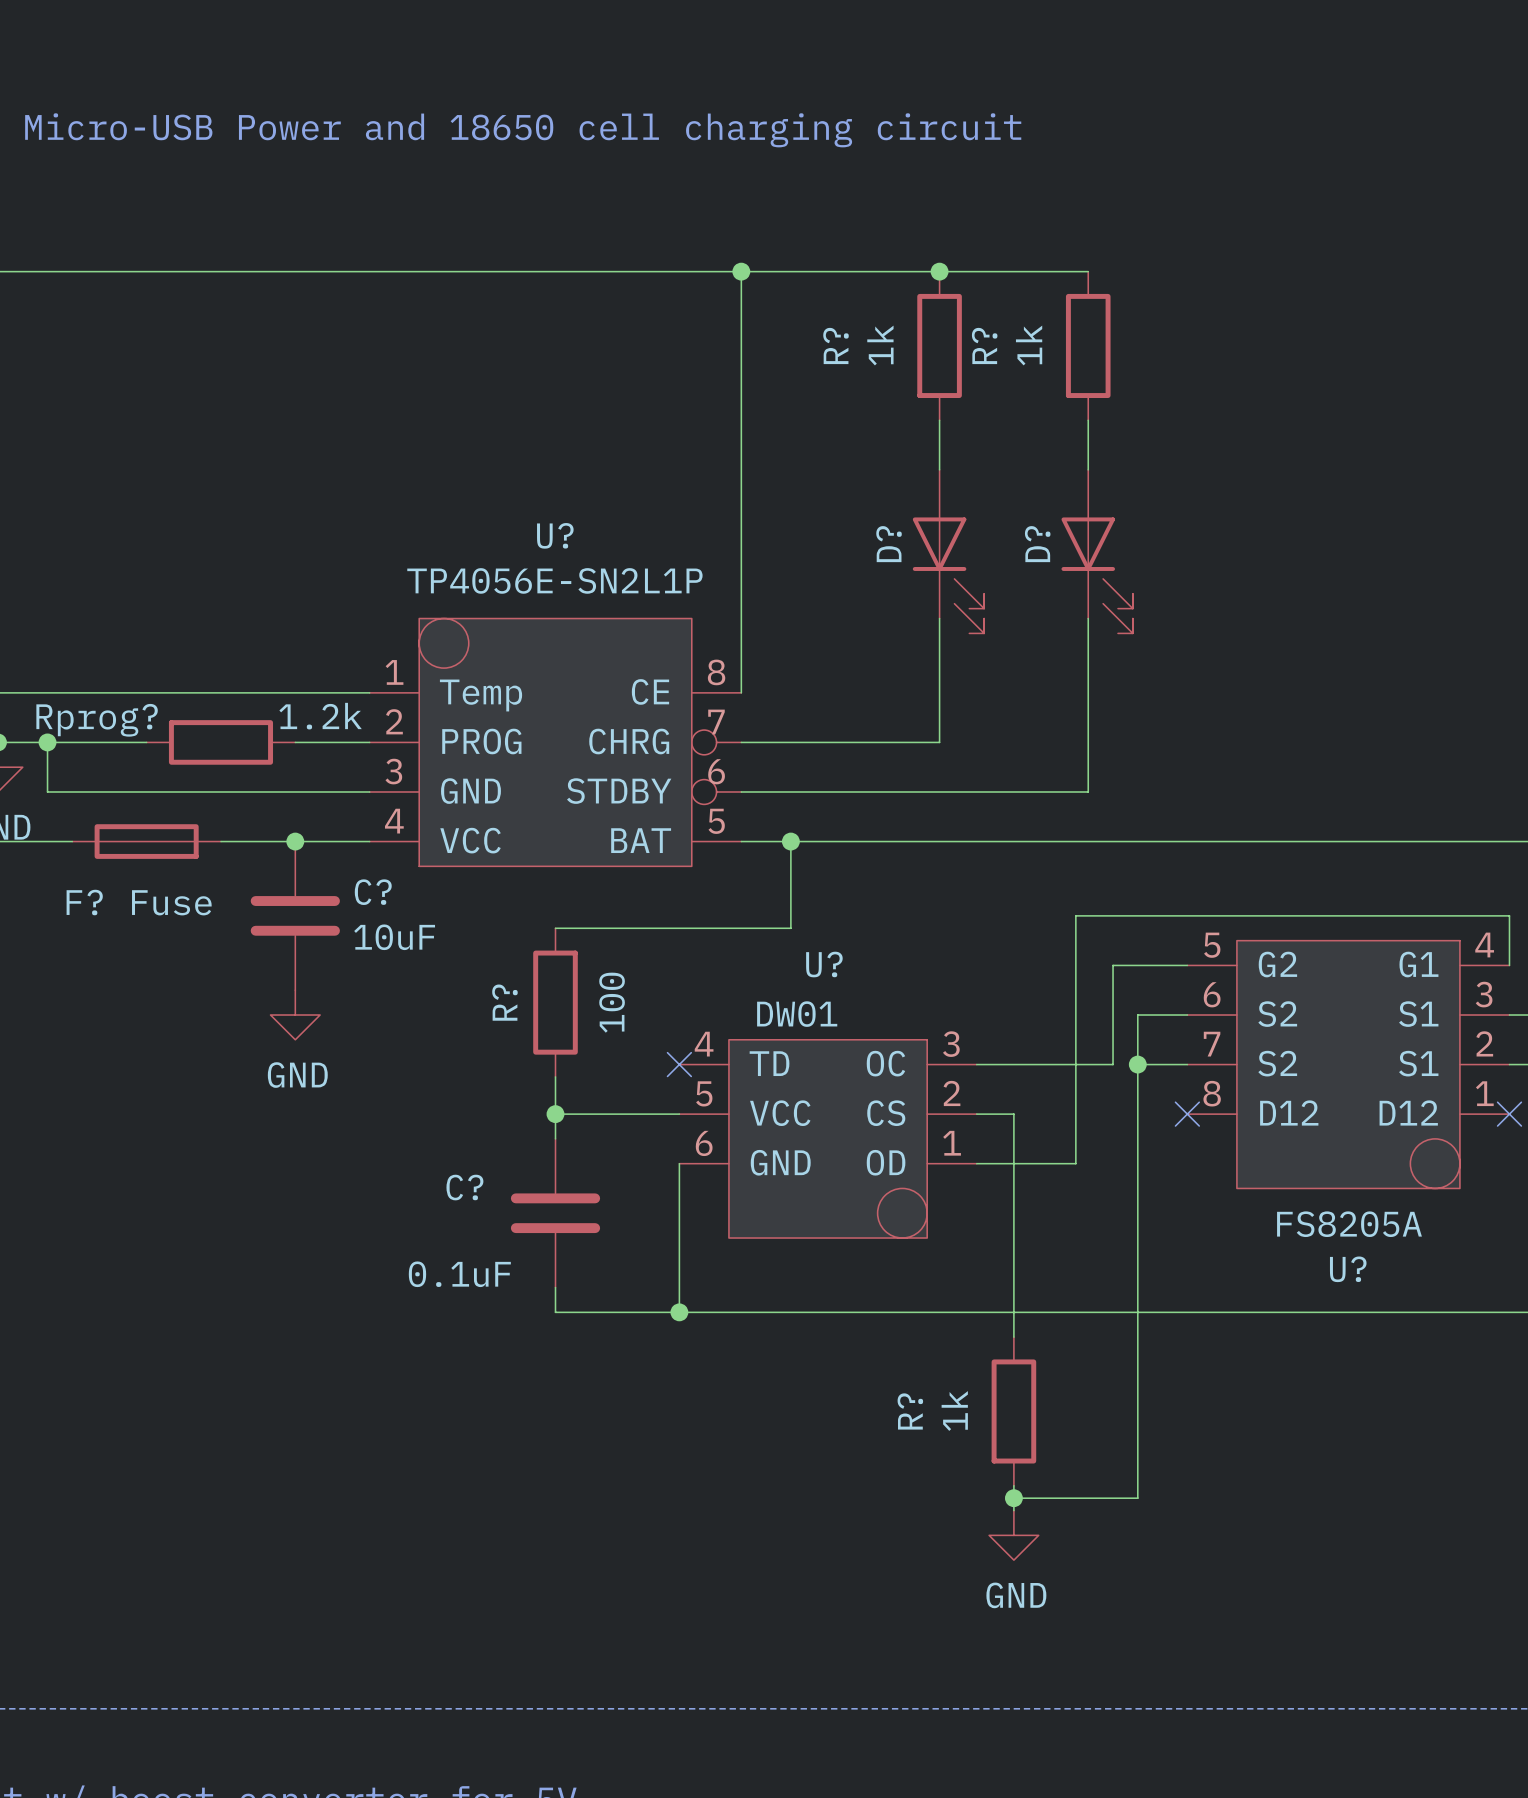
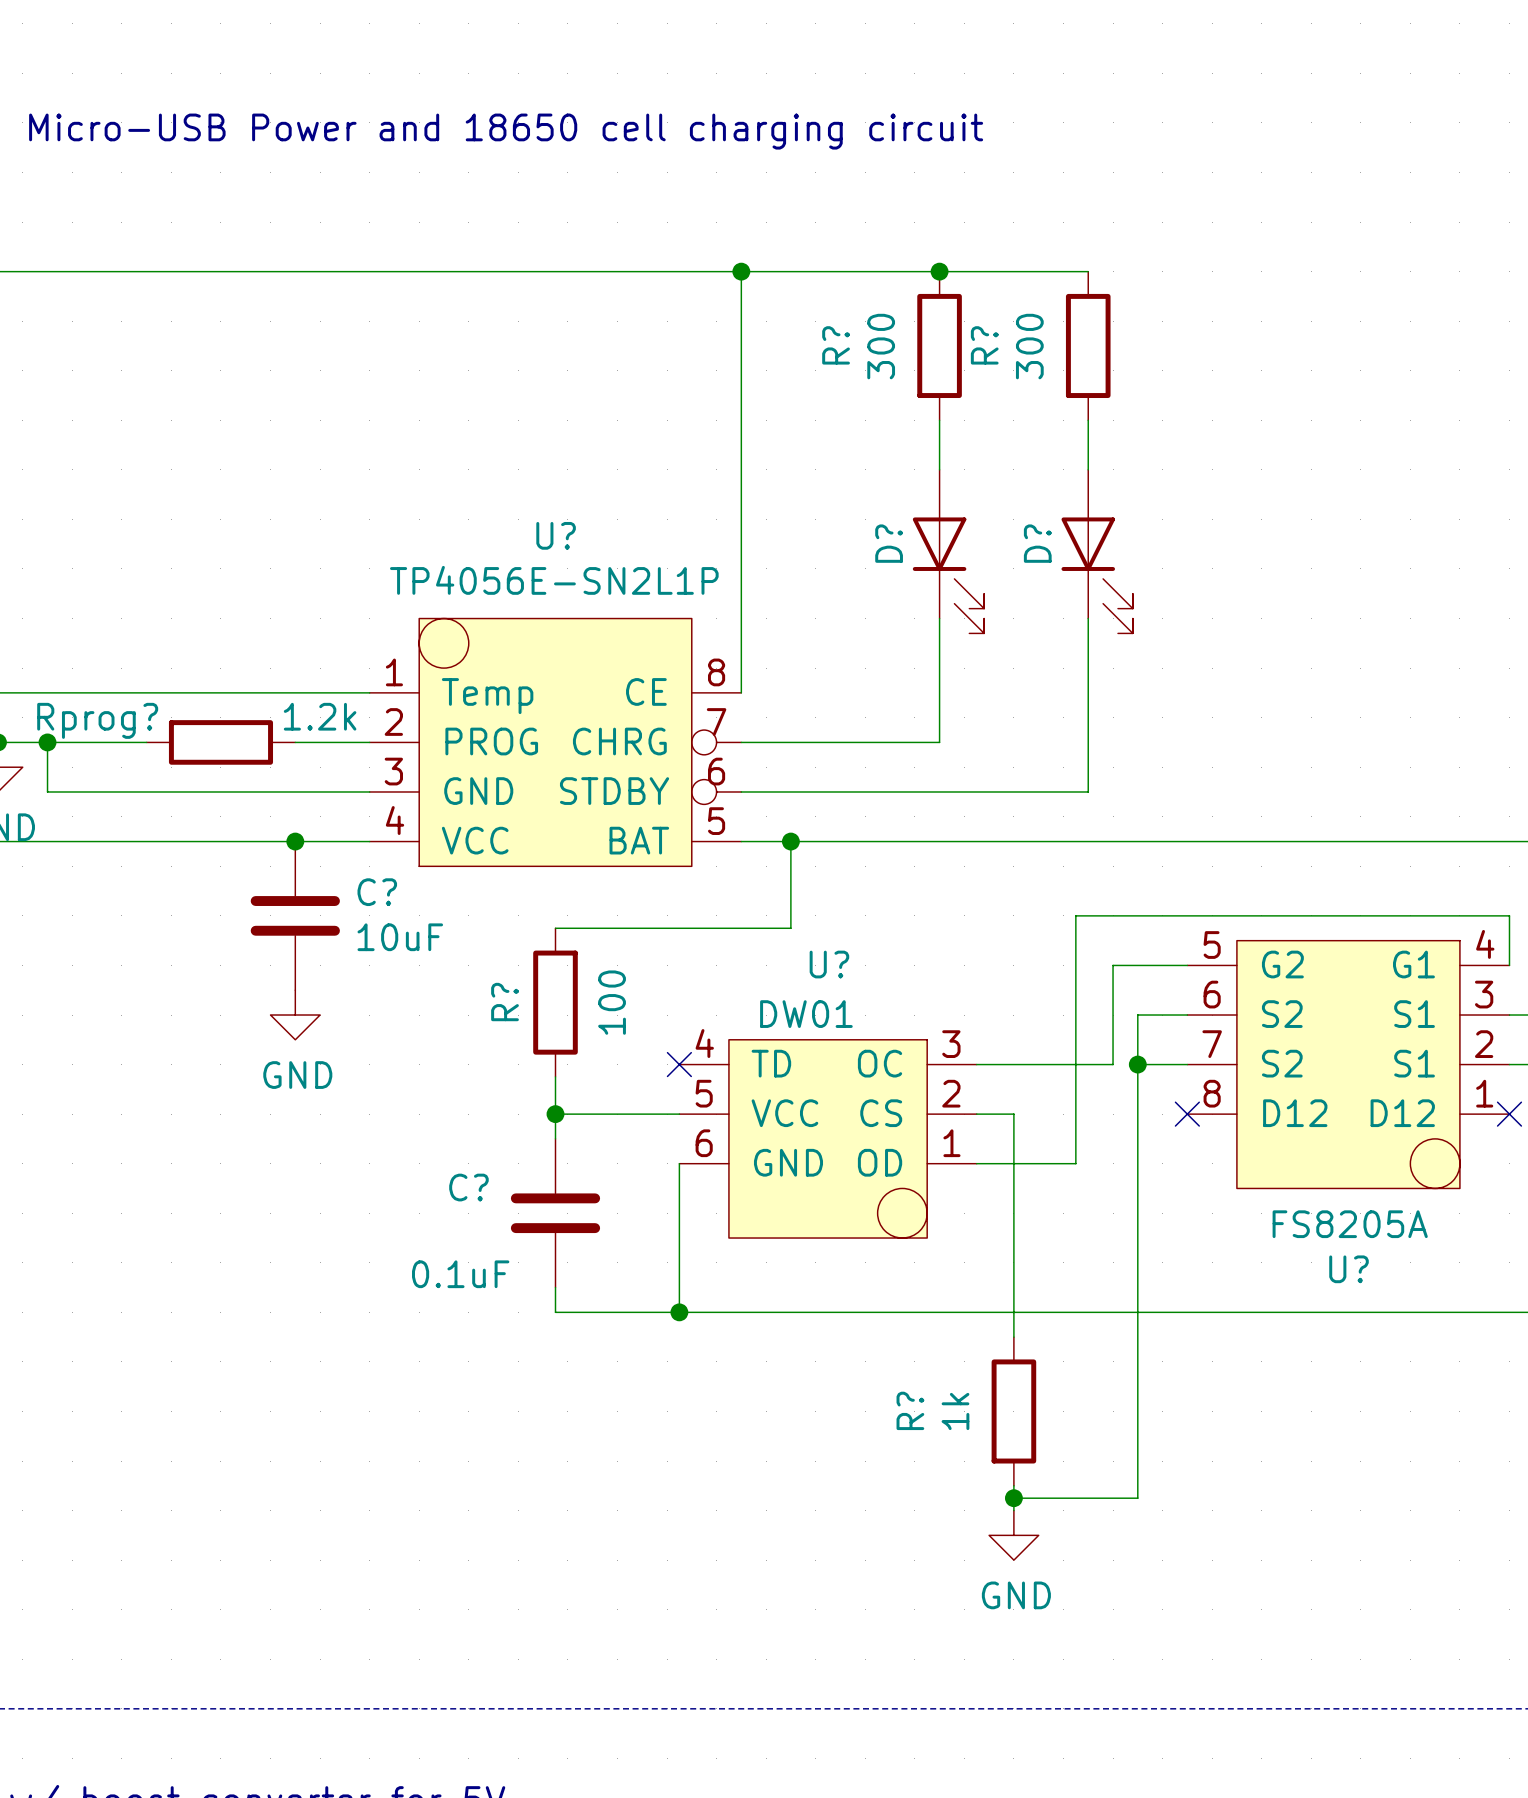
R? value: 1k (880, 345) -> 300 (881, 346)
R? value: 1k (1029, 345) -> 300 (1029, 346)
F?: Fuse (146, 841) -> none

